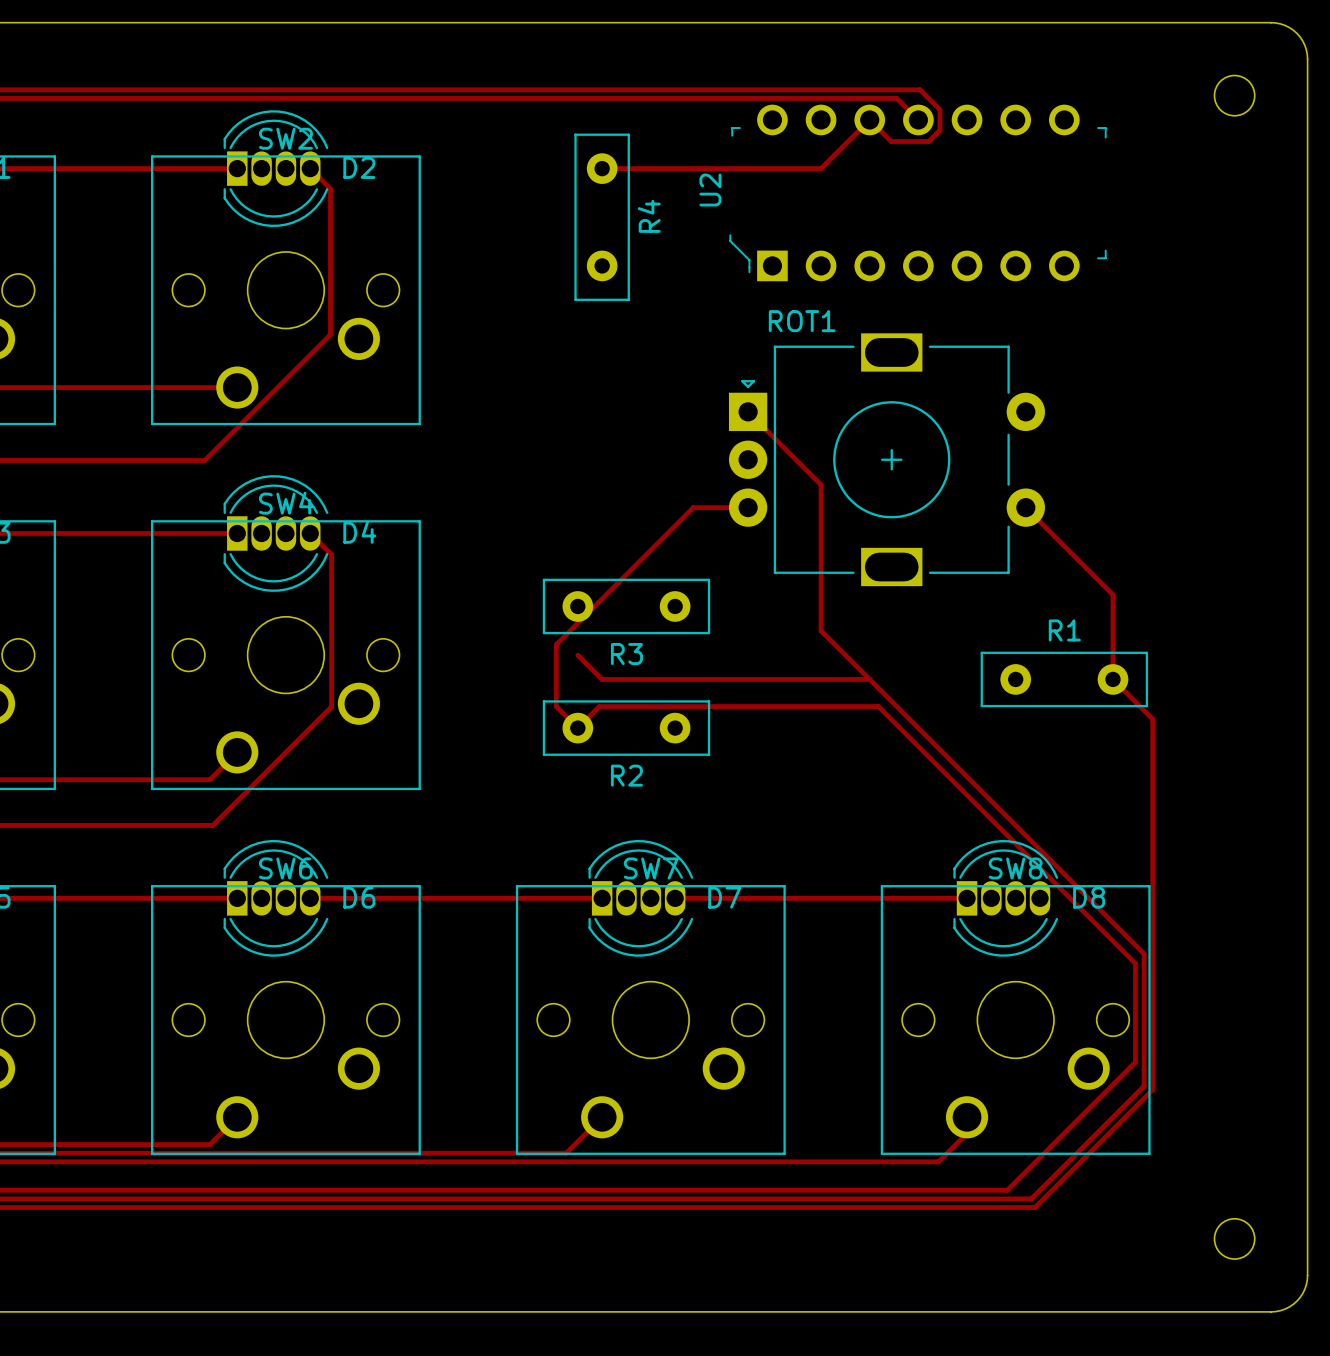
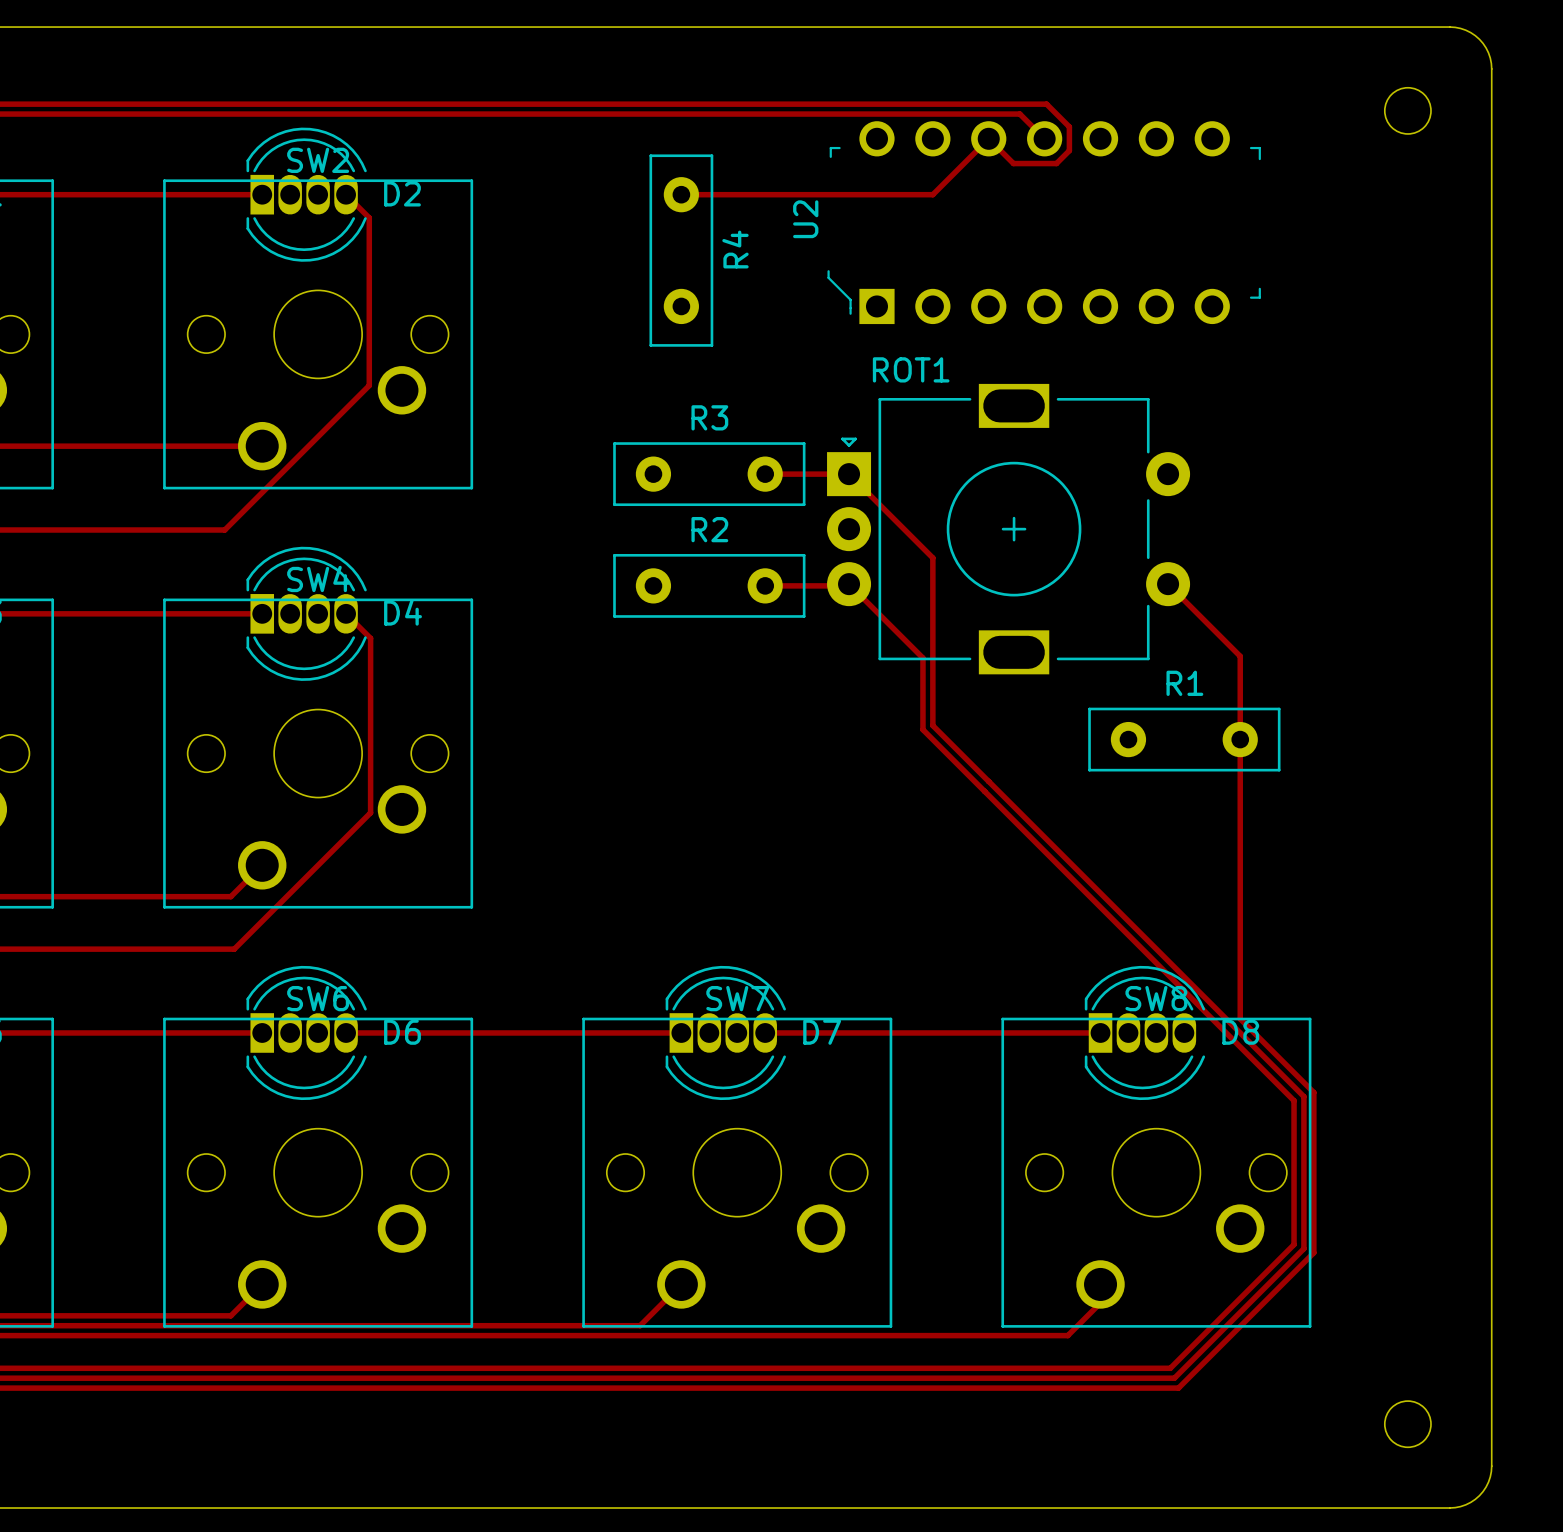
track: none -> (765, 474) (849, 474)
track: (748, 507) (693, 507) (556, 644) (556, 706) (577, 728) (599, 706) (878, 706) (1135, 963) (1135, 1062) (1007, 1190) -> (765, 585) (847, 585) (849, 584) (922, 658) (922, 729) (1294, 1100) (1294, 1244) (1170, 1368) (1146, 1368)
track: (1088, 570) (1112, 594) (1112, 679) (1152, 719) (1152, 950) -> (1240, 656) (1240, 1018) (1313, 1092)
R3 position: (626, 606) -> (709, 474)
R3 name position: R3 (626, 654) -> R3 (709, 417)
track: (577, 655) (602, 679) (869, 679) -> none
R1 position: (1064, 679) -> (1184, 739)
R2 position: (626, 728) -> (709, 585)
R2 name position: R2 (626, 775) -> R2 (709, 529)

